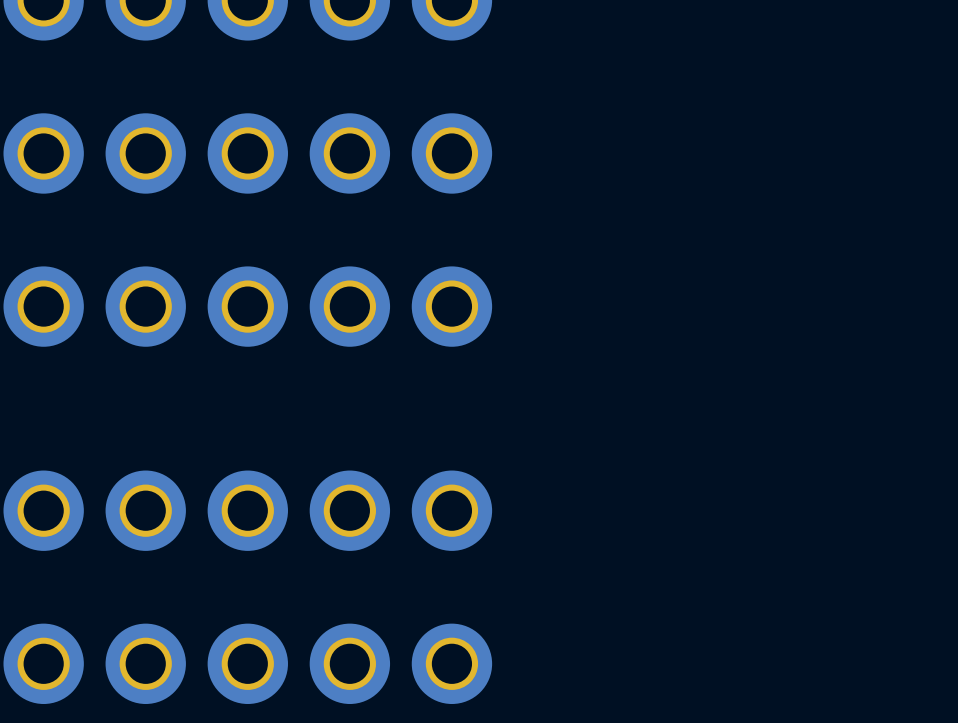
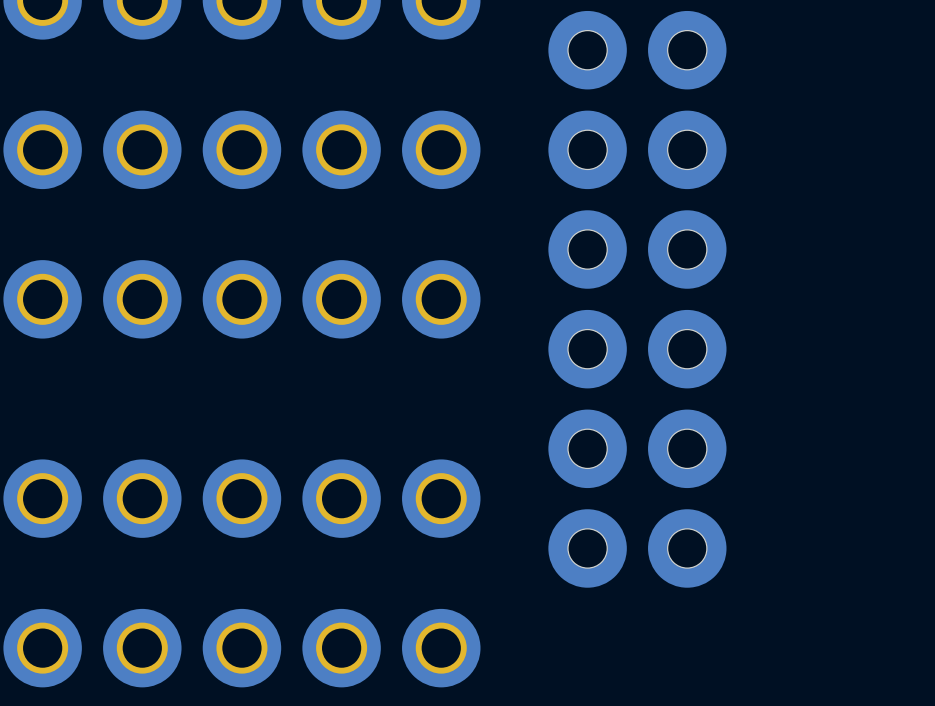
part: none -> (587, 50)
part: none -> (687, 50)
part: none -> (587, 149)
part: none -> (687, 149)
part: none -> (587, 249)
part: none -> (687, 249)
part: none -> (587, 349)
part: none -> (687, 349)
part: none -> (587, 448)
part: none -> (687, 448)
part: none -> (587, 548)
part: none -> (687, 548)

